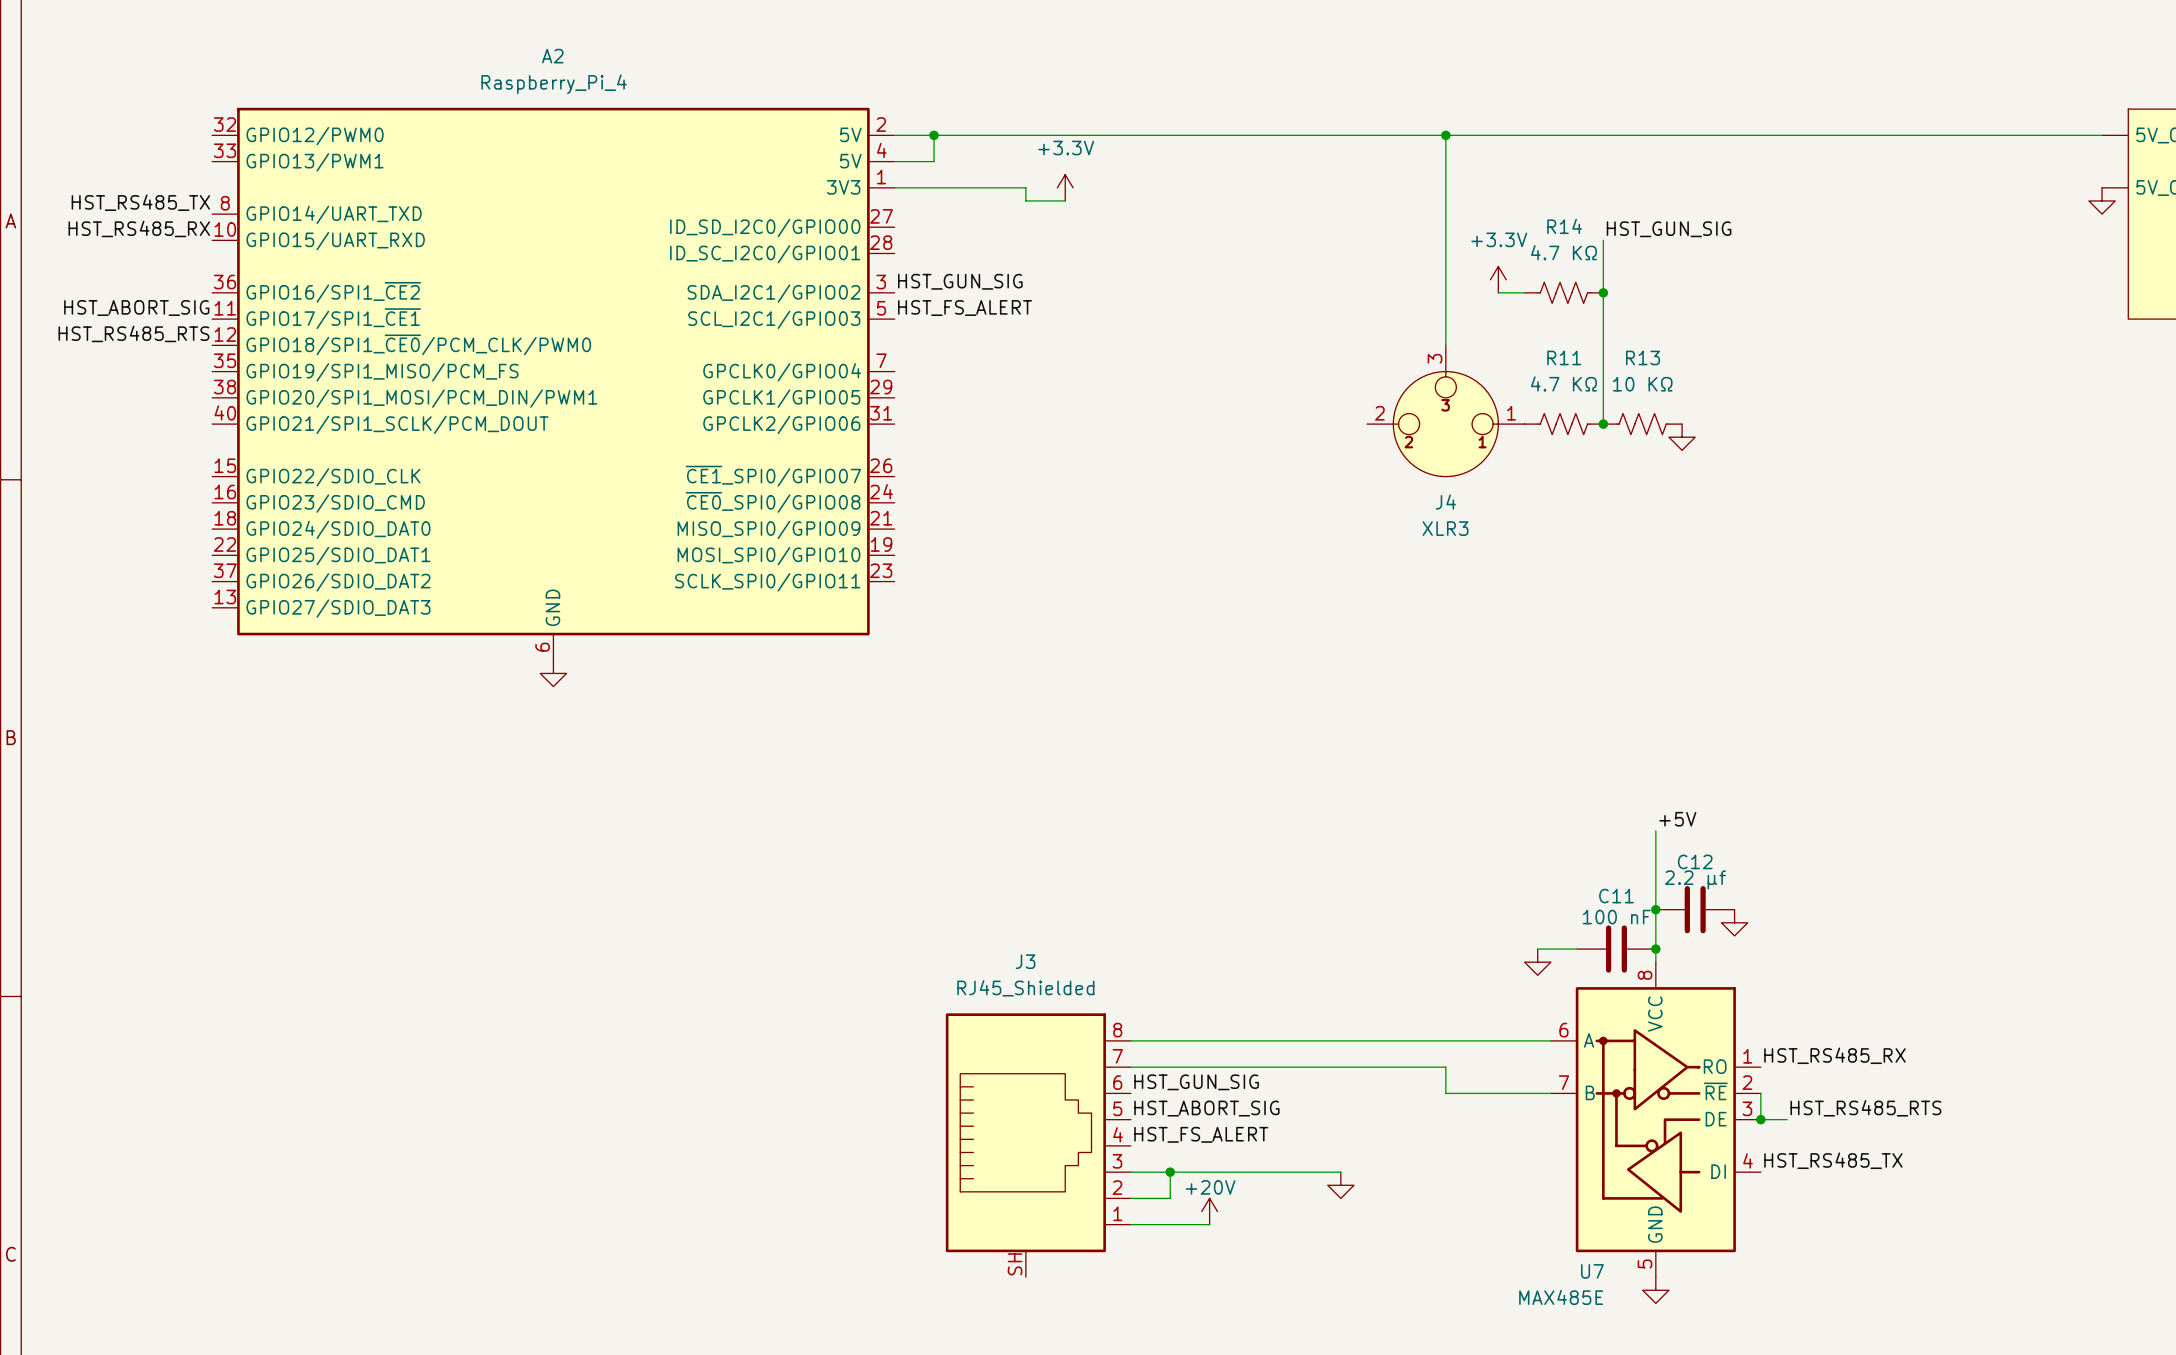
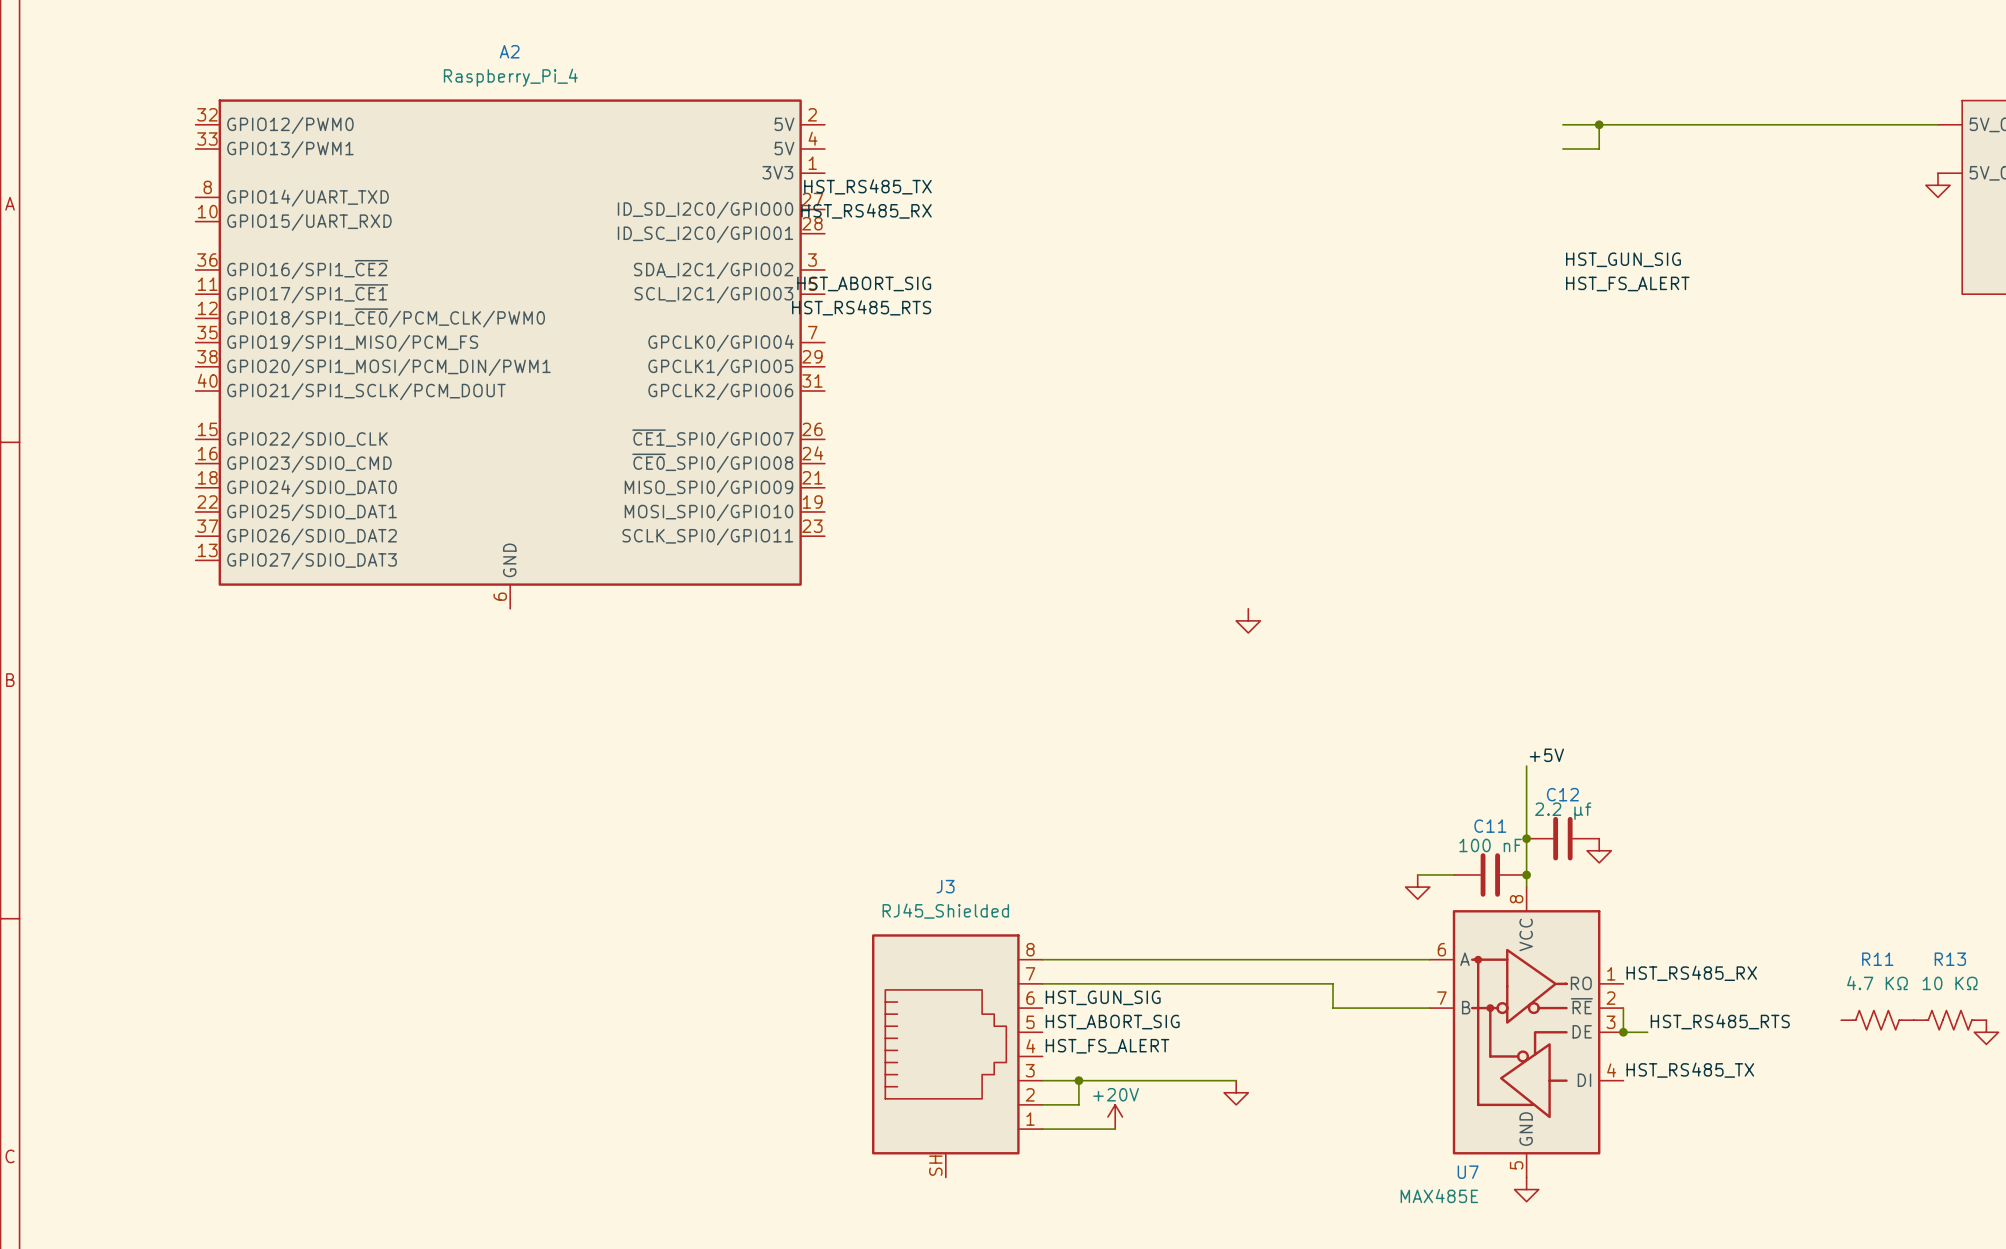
wire: (894, 135) (1695, 135) -> none
wire: (934, 135) (934, 161) (894, 161) -> none
junction: (934, 135) -> none
wire: (1445, 135) (1445, 345) -> none
junction: (1445, 135) -> none
wire: none -> (1599, 124) (1599, 148) (1562, 148)
junction: none -> (1599, 124)
wire: (894, 187) (1025, 187) (1025, 200) (1065, 200) -> none
power symbol: +3.3V (1065, 187) -> none
label: HST_RS485_TX (140, 202) -> none
label: none -> HST_RS485_TX (867, 186)
label: HST_RS485_RX (139, 228) -> none
label: none -> HST_RS485_RX (866, 211)
label position: HST_GUN_SIG (1669, 229) -> HST_GUN_SIG (1623, 259)
wire: (1603, 240) (1603, 424) -> none
power symbol: +3.3V (1498, 279) -> none
label: HST_GUN_SIG (960, 281) -> HST_ABORT_SIG (864, 283)
wire: (1498, 292) (1524, 292) -> none
R14: 4.7 KΩ (1563, 292) -> none
junction: (1603, 292) -> none
label: HST_ABORT_SIG (136, 308) -> none
label: HST_FS_ALERT (965, 308) -> HST_RS485_RTS (861, 307)
label: none -> HST_FS_ALERT (1627, 283)
label: HST_RS485_RTS (133, 333) -> none
J4: XLR3 (1445, 410) -> none
R11 position: (1563, 424) -> (1877, 1020)
junction: (1603, 424) -> none
R13 position: (1642, 424) -> (1950, 1020)
power symbol: (1682, 437) -> none
power symbol: (553, 673) -> none
power symbol: none -> (1248, 620)
power symbol: none -> (1986, 1032)

